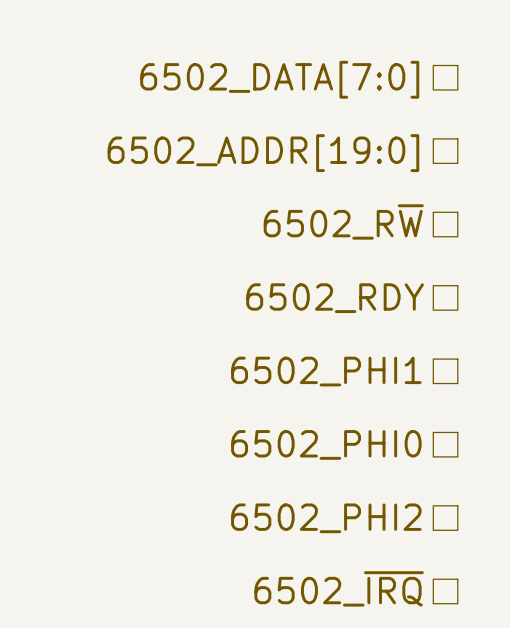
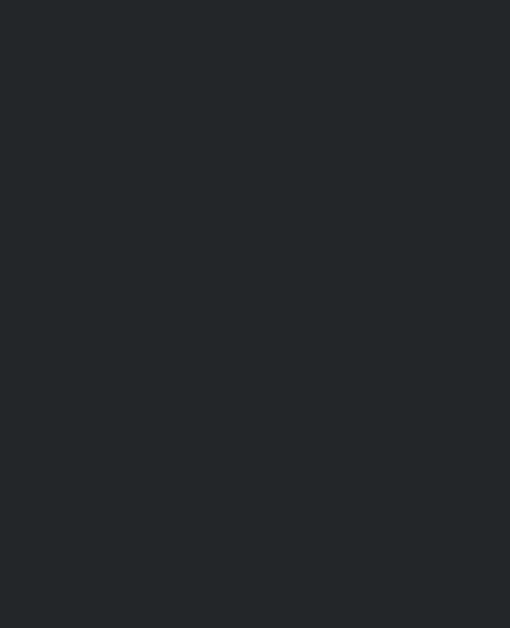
hierarchical label: 6502_DATA[7:0] (279, 79) -> none
hierarchical label: 6502_ADDR[19:0] (263, 153) -> none
hierarchical label: 6502_R~{W} (343, 221) -> none
hierarchical label: 6502_RDY (335, 298) -> none
hierarchical label: 6502_PHI1 (326, 371) -> none
hierarchical label: 6502_PHI0 (326, 444) -> none
hierarchical label: 6502_PHI2 (326, 518) -> none
hierarchical label: 6502_~{IRQ} (339, 588) -> none

